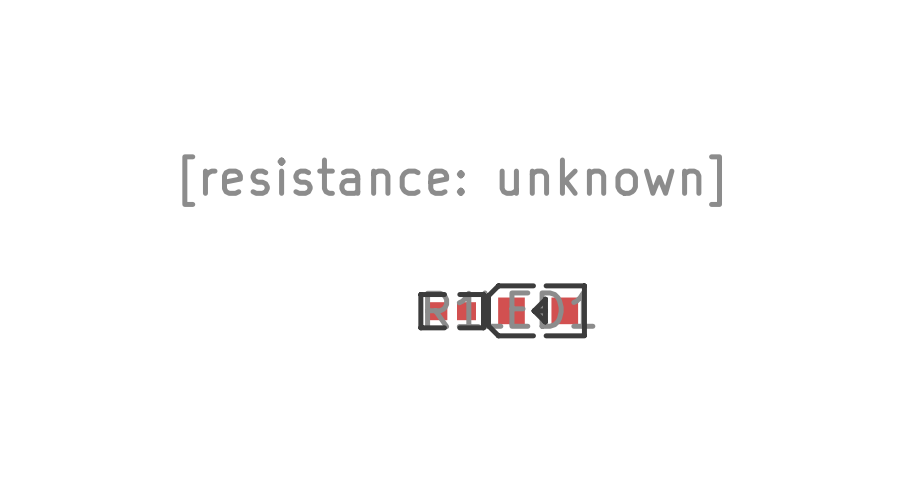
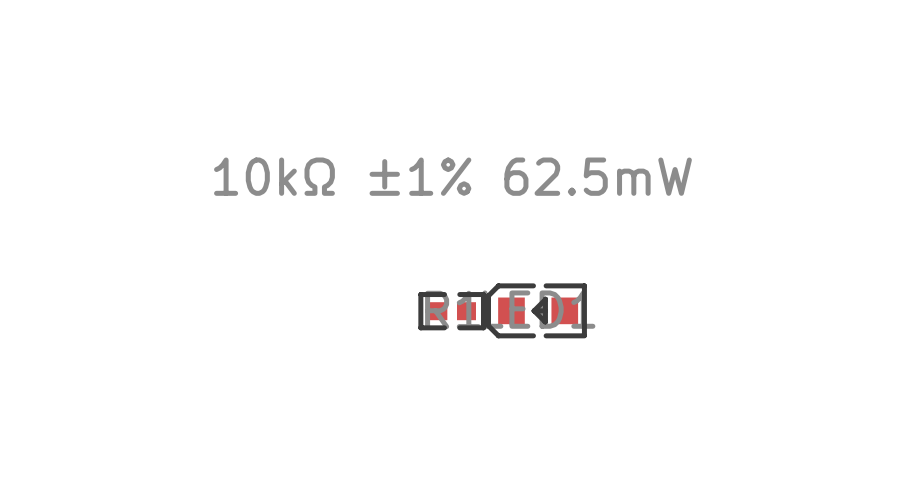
part value: [resistance: unknown] (452, 180) -> 10kΩ ±1% 62.5mW (452, 176)

